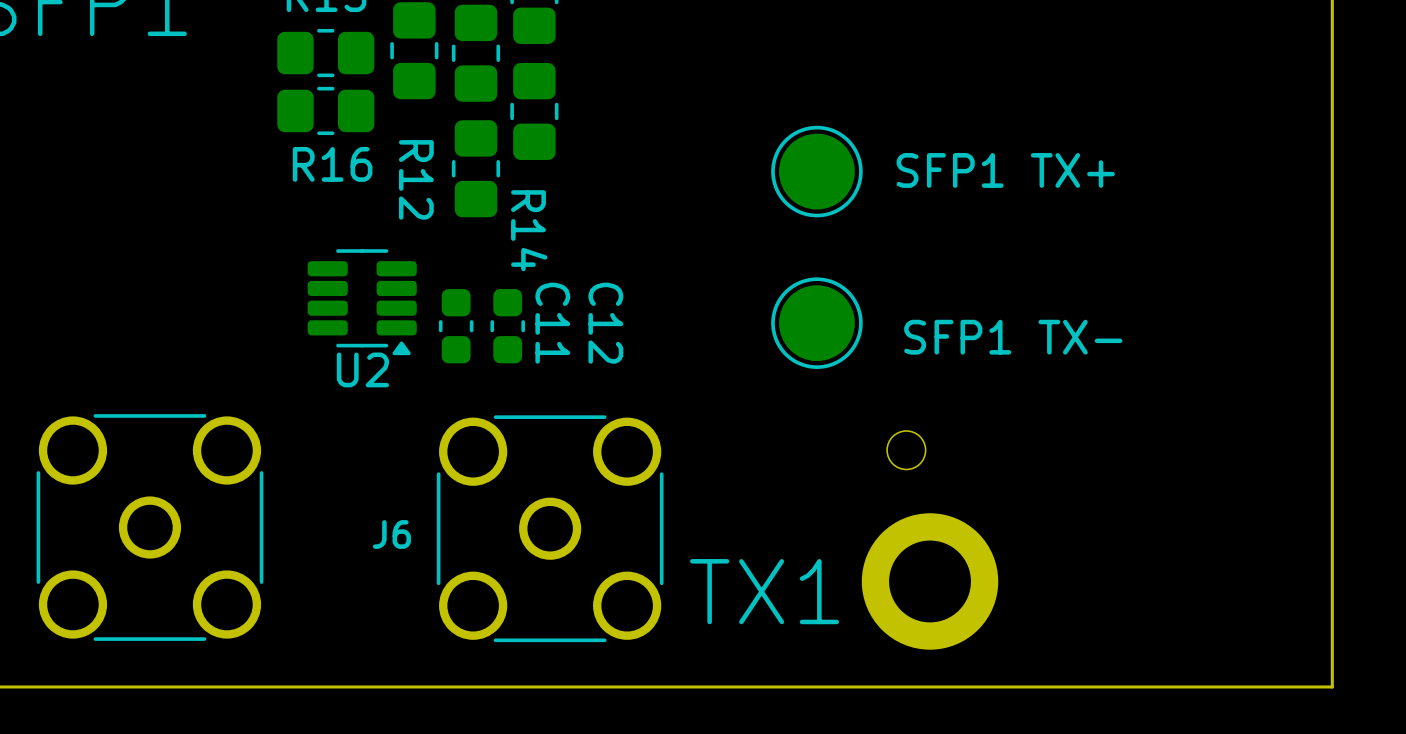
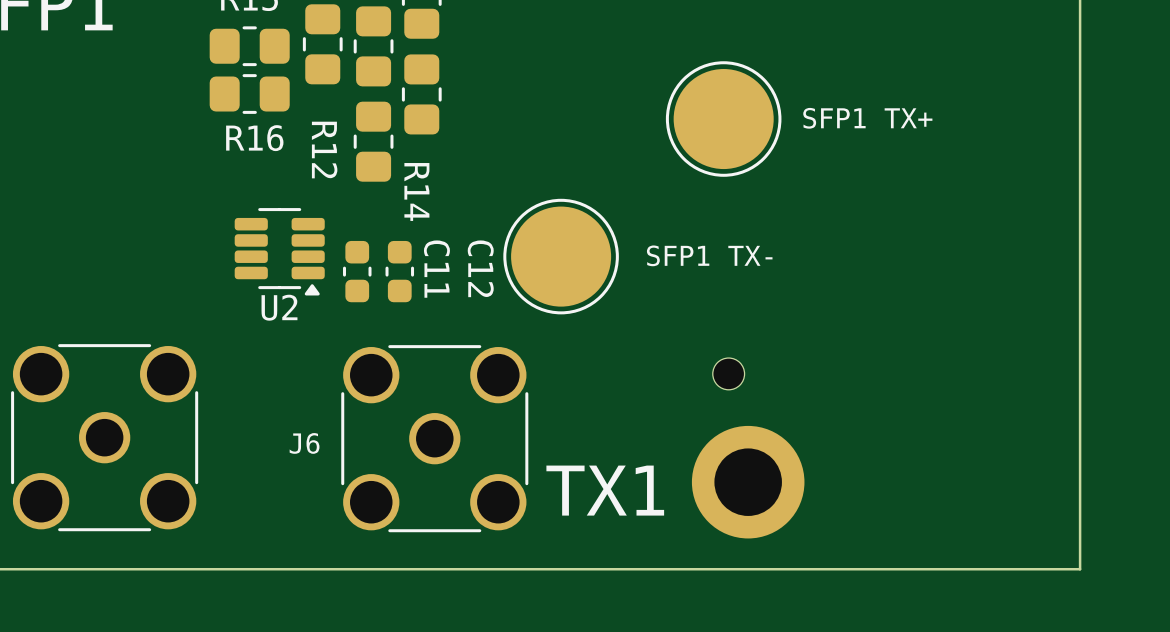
part: none -> SFP1 TX+ (723, 119)
part: SFP1 TX+ (816, 171) -> none
part: none -> SFP1 TX- (561, 256)
part: SFP1 TX- (816, 323) -> none

